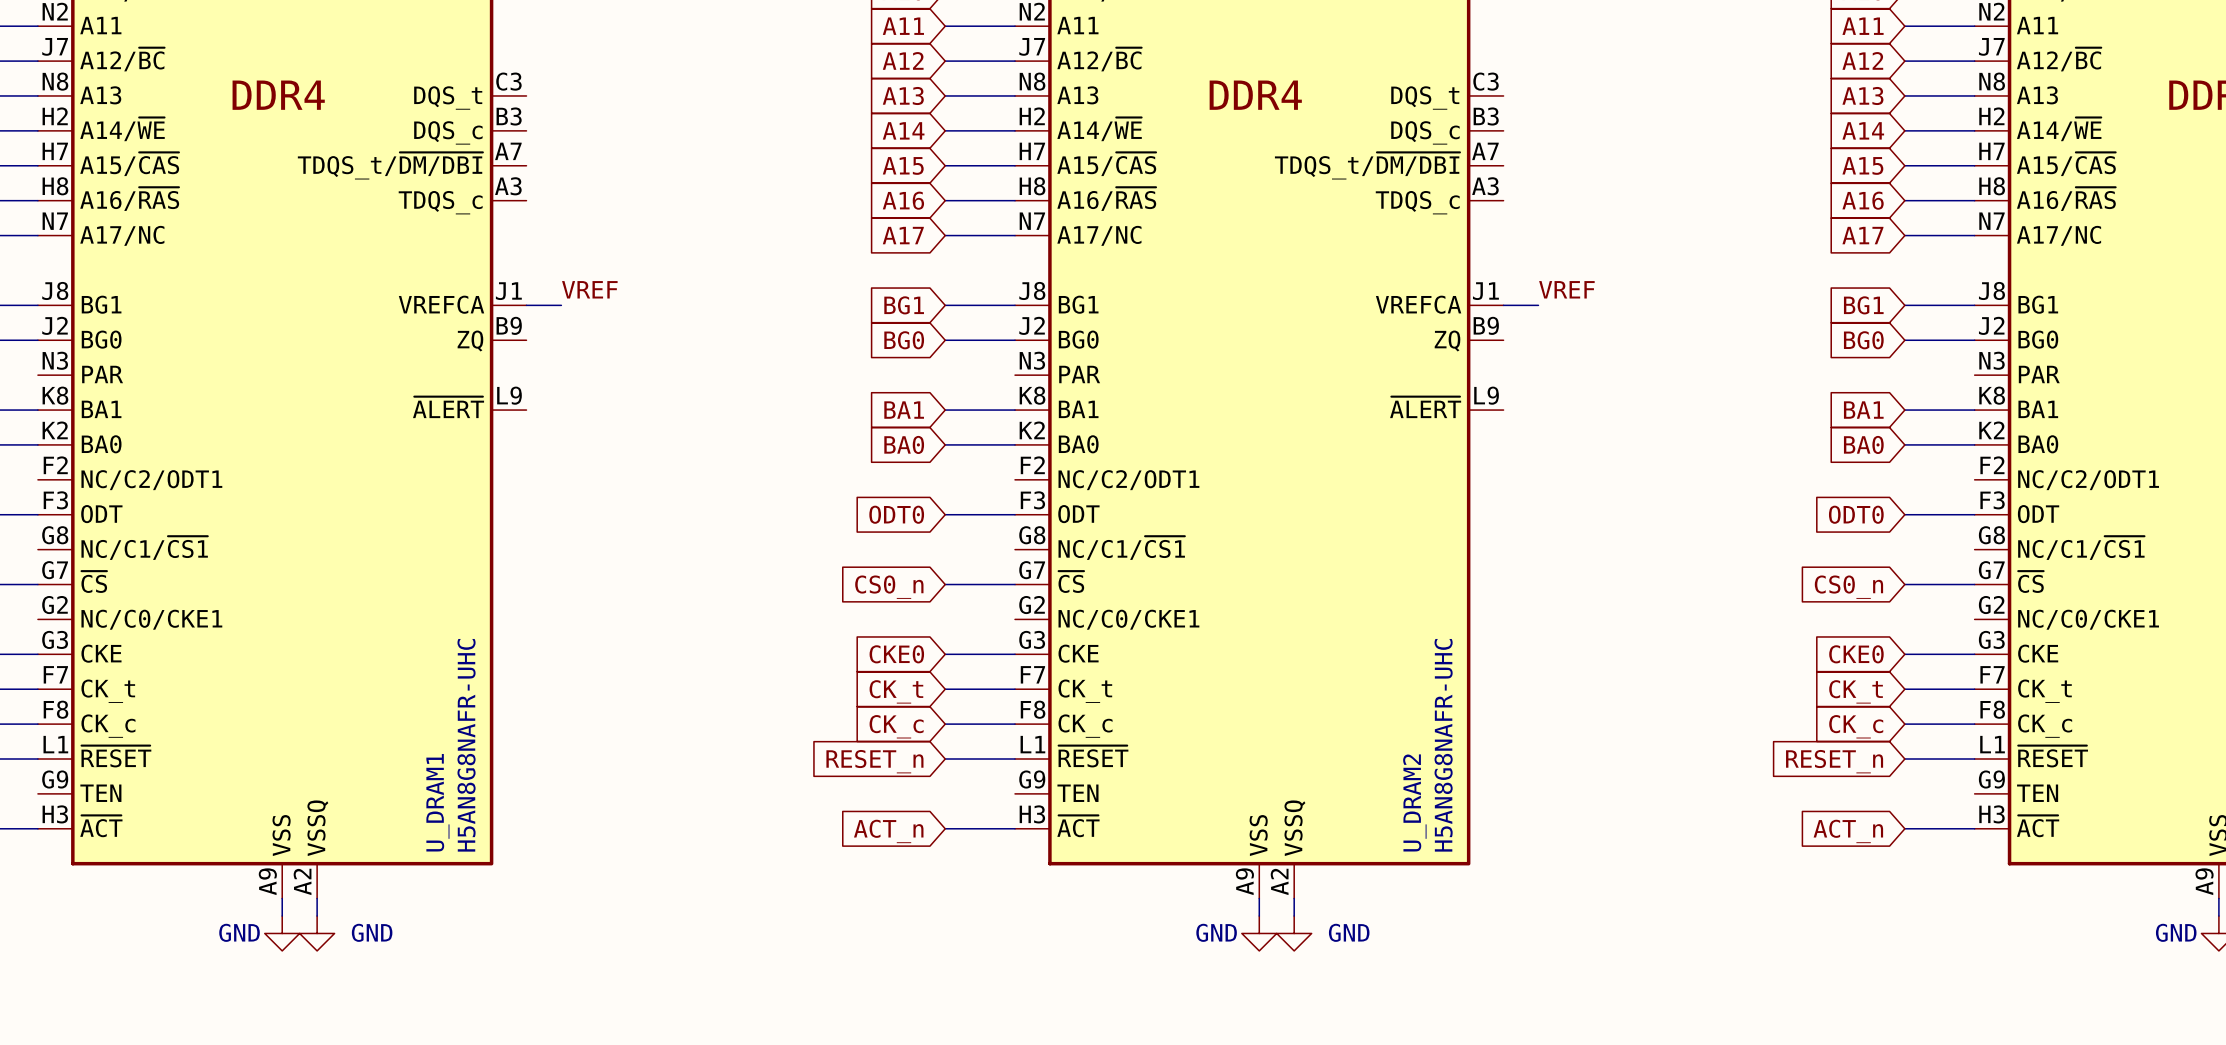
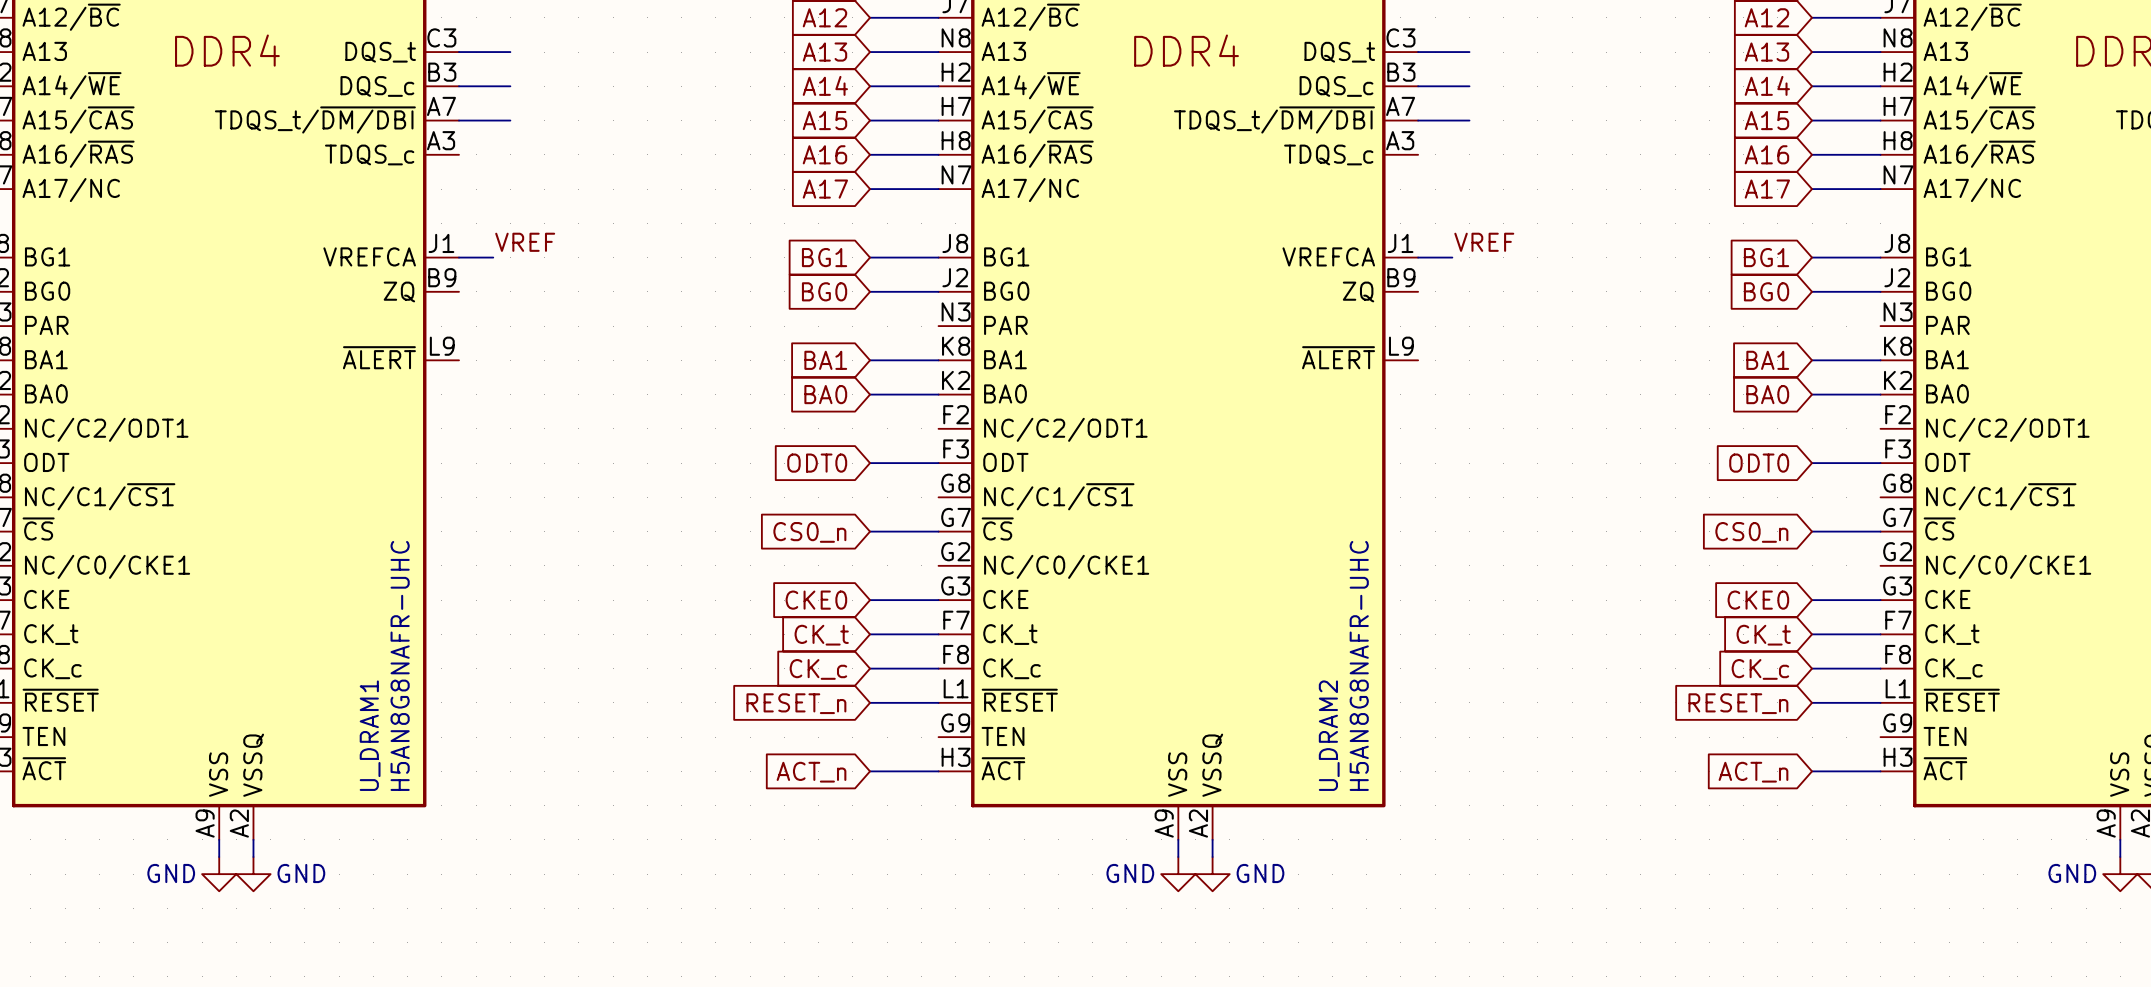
wire: none -> (458, 52) (510, 52)
wire: none -> (1418, 52) (1469, 52)
wire: none -> (458, 86) (510, 86)
wire: none -> (1418, 86) (1469, 86)
wire: none -> (458, 120) (510, 120)
wire: none -> (1418, 120) (1469, 120)

